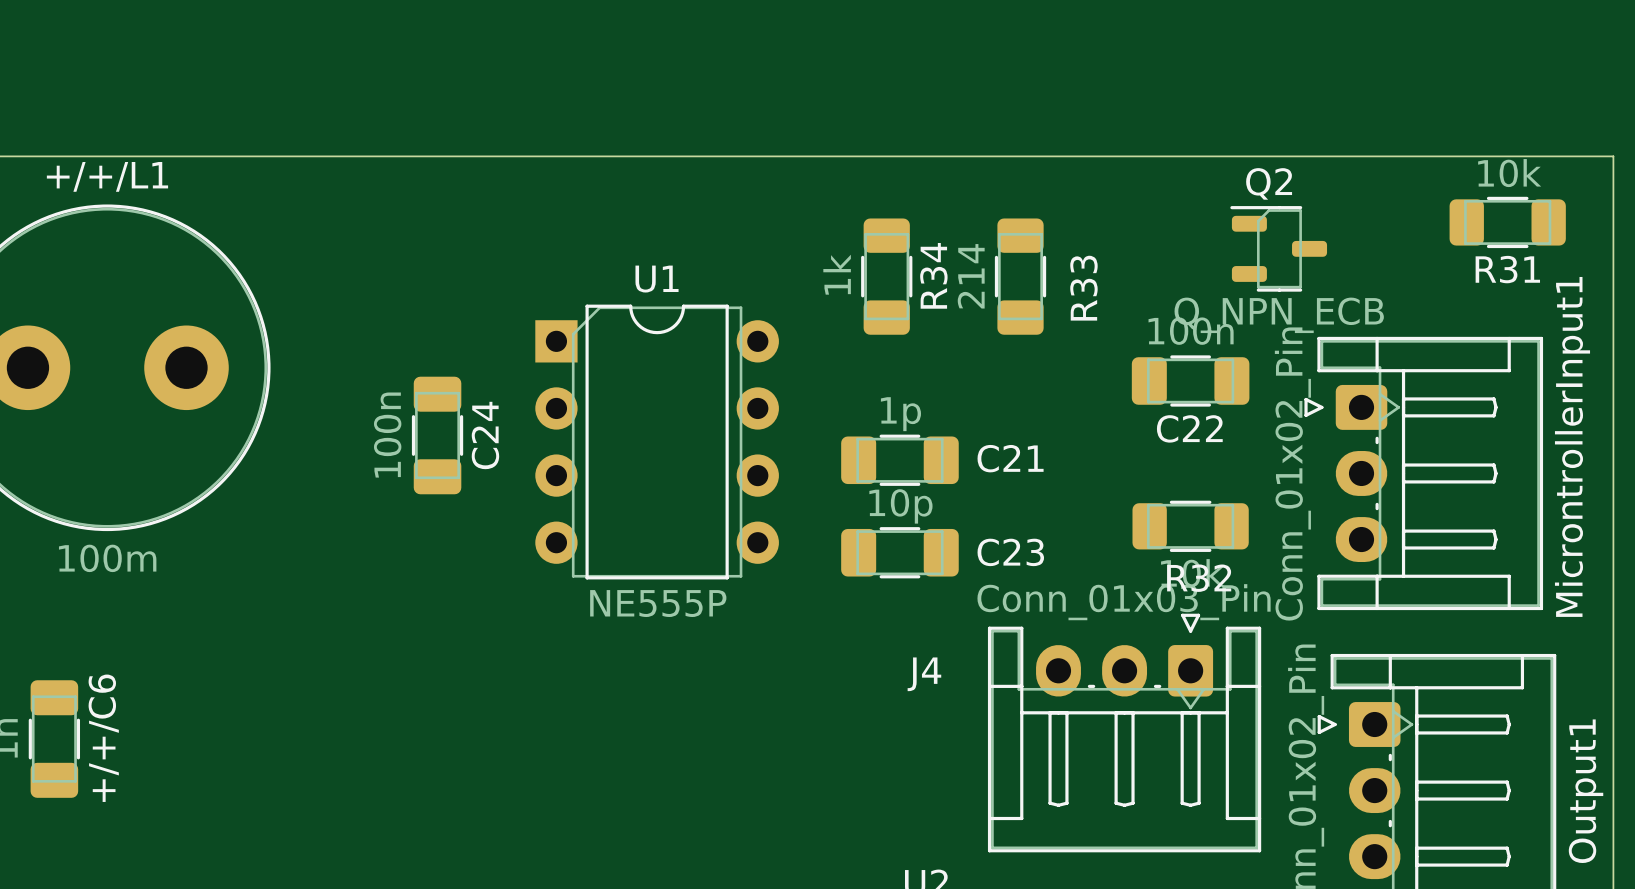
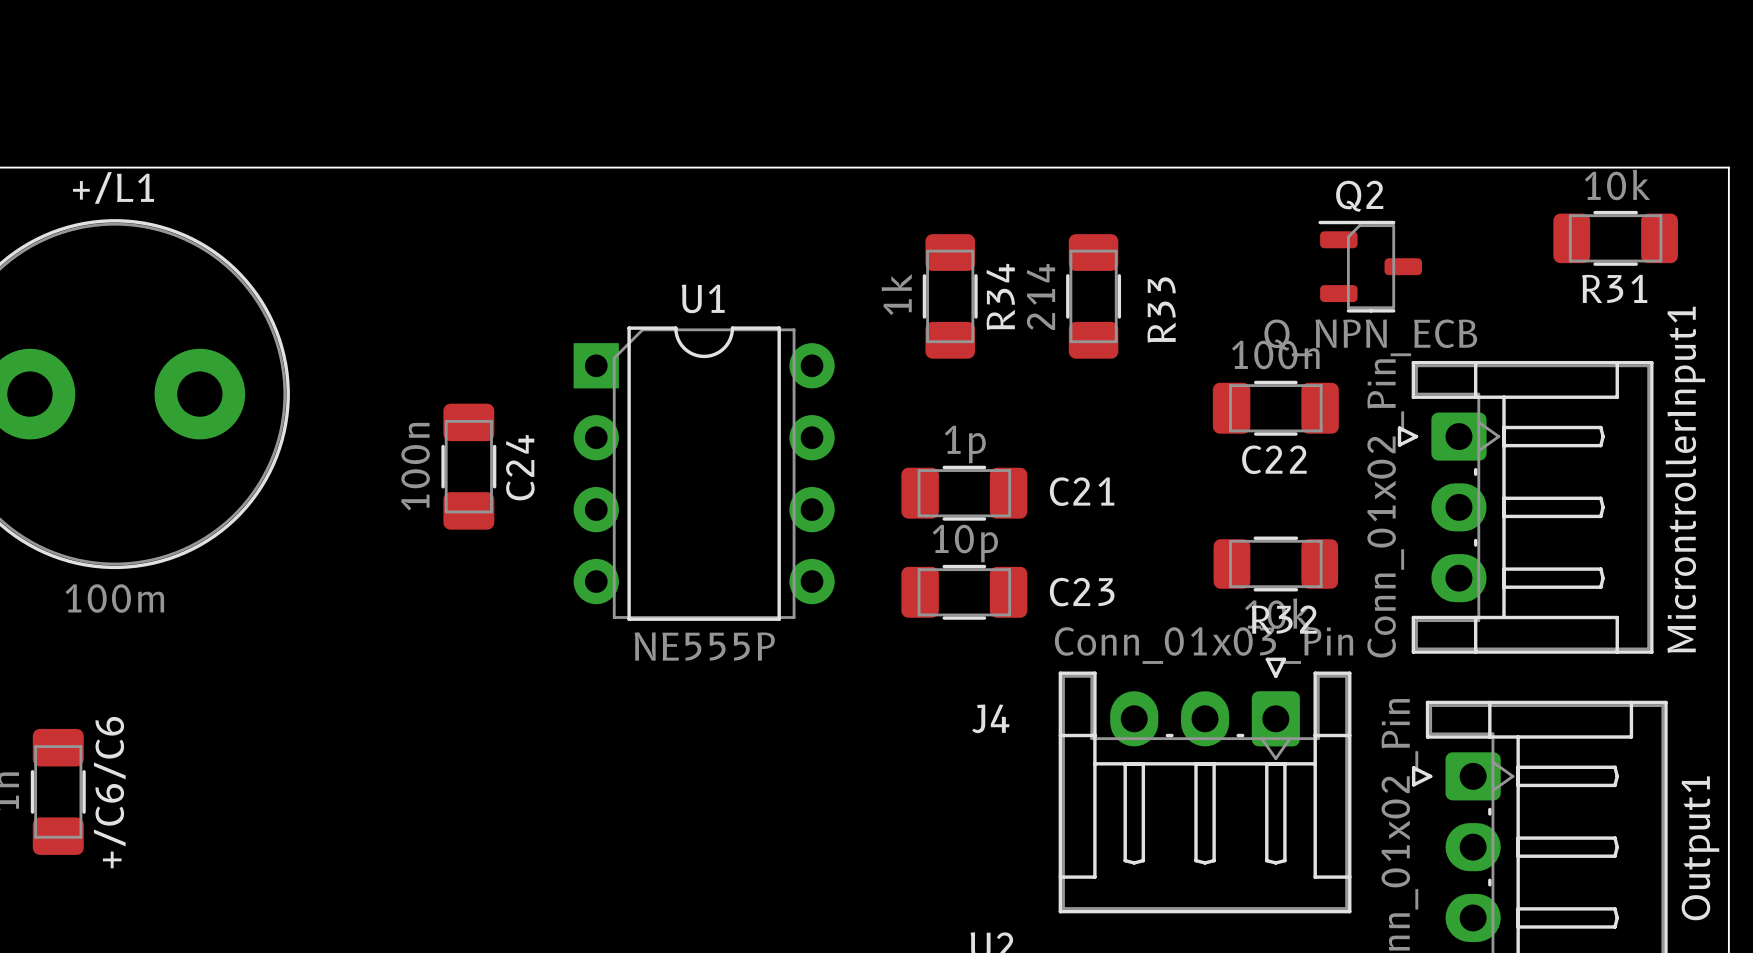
+/+/L1 name: +/+/L1 (107, 176) -> +/L1 (113, 187)
+/+/C6 name: +/+/C6 (103, 738) -> +/C6/C6 (109, 792)

